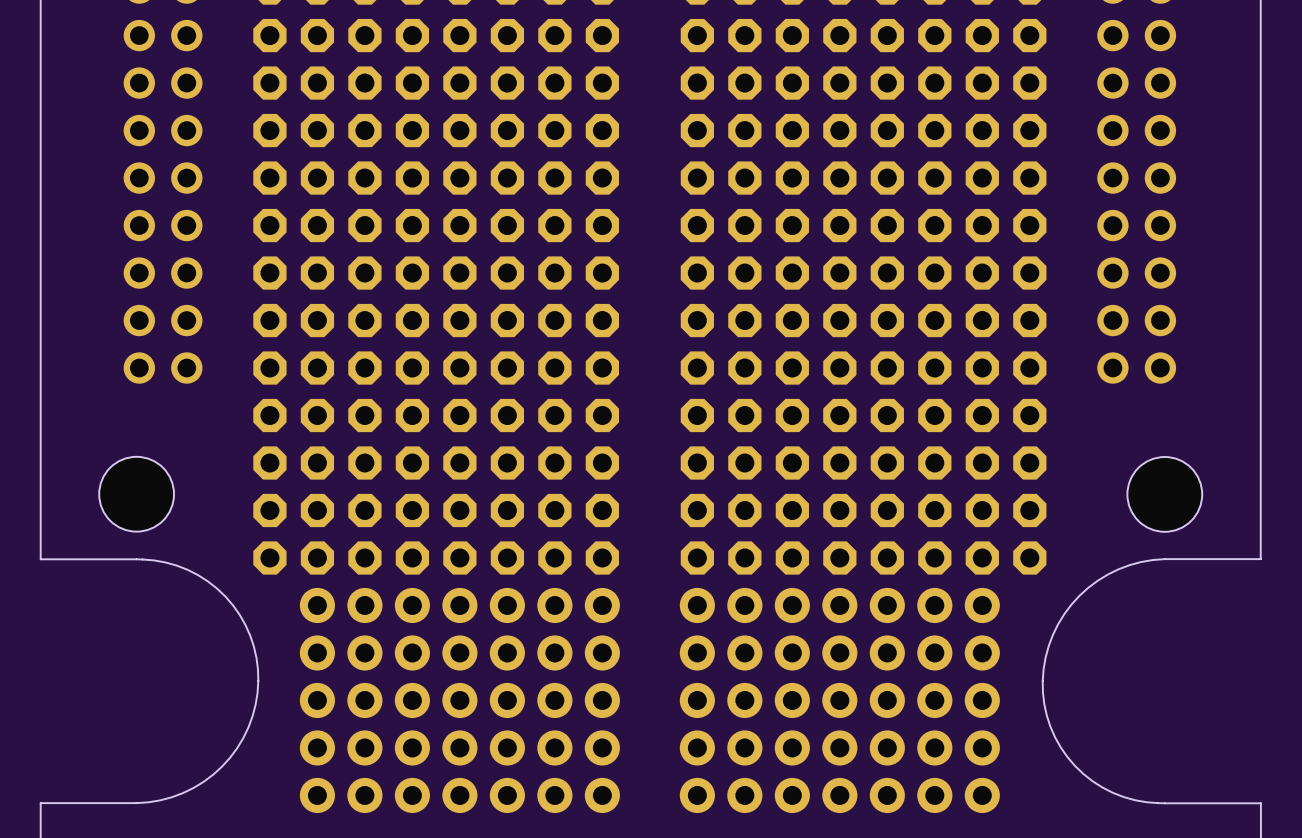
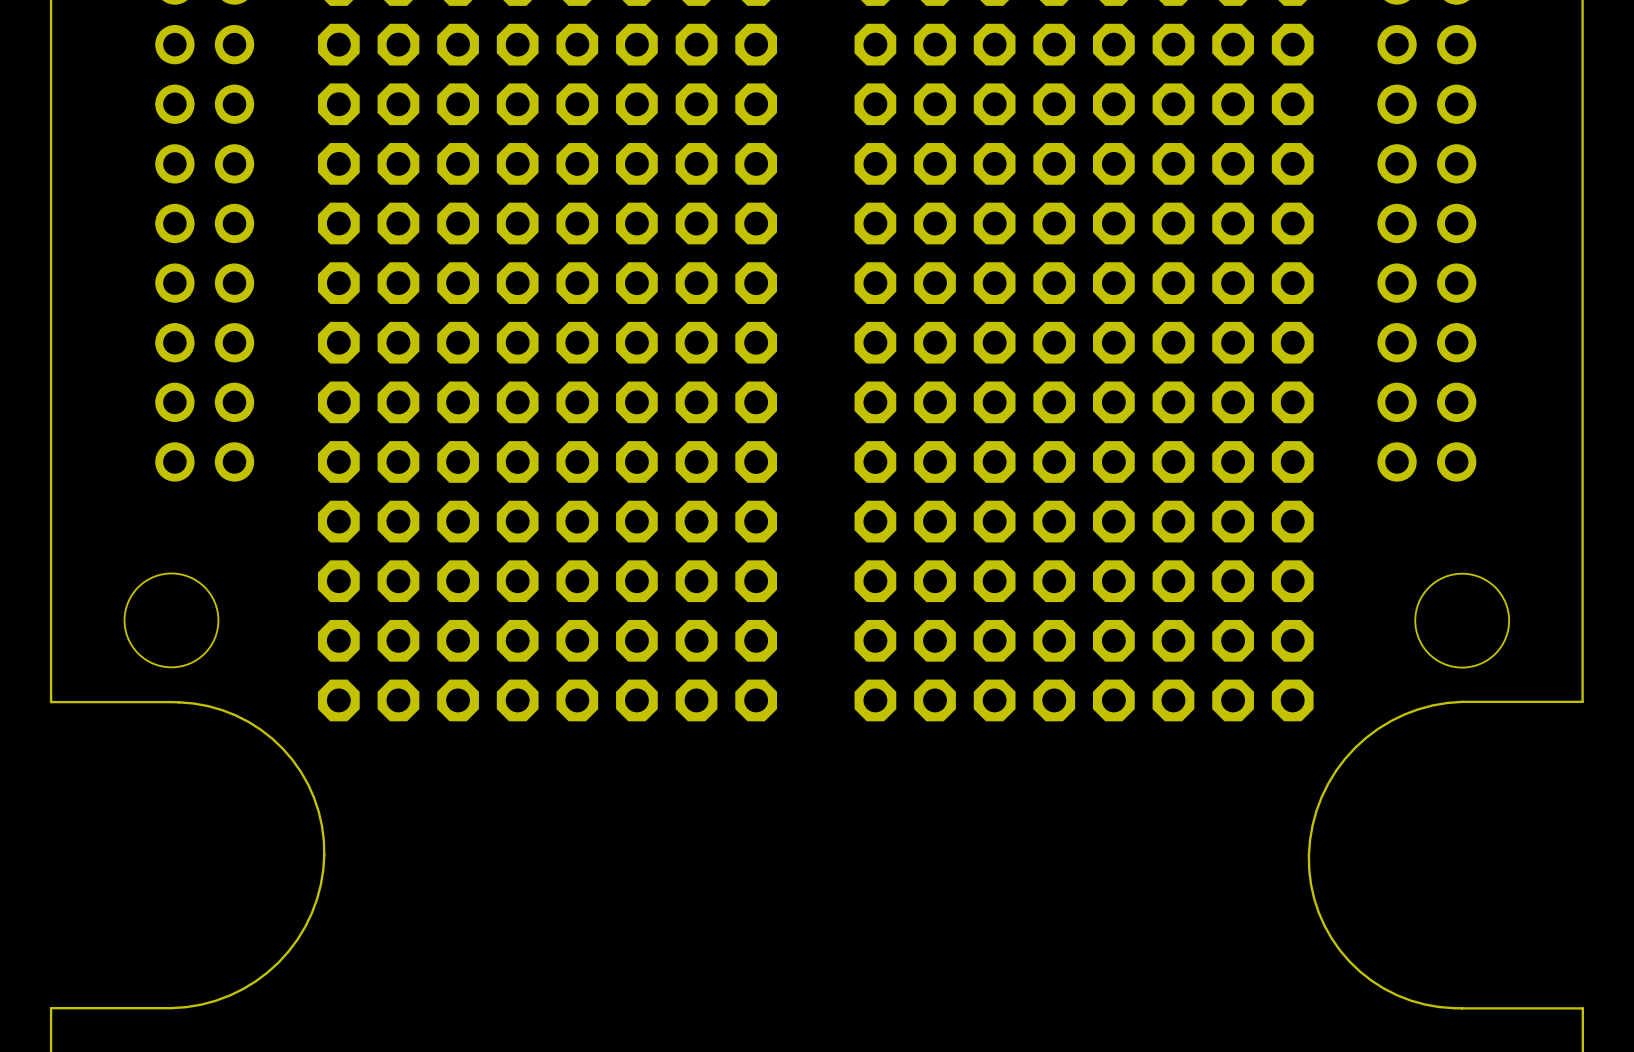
part: (459, 605) -> none
part: (839, 605) -> none
part: (459, 652) -> none
part: (839, 652) -> none
part: (459, 700) -> none
part: (839, 700) -> none
part: (459, 747) -> none
part: (839, 747) -> none
part: (459, 795) -> none
part: (839, 795) -> none

